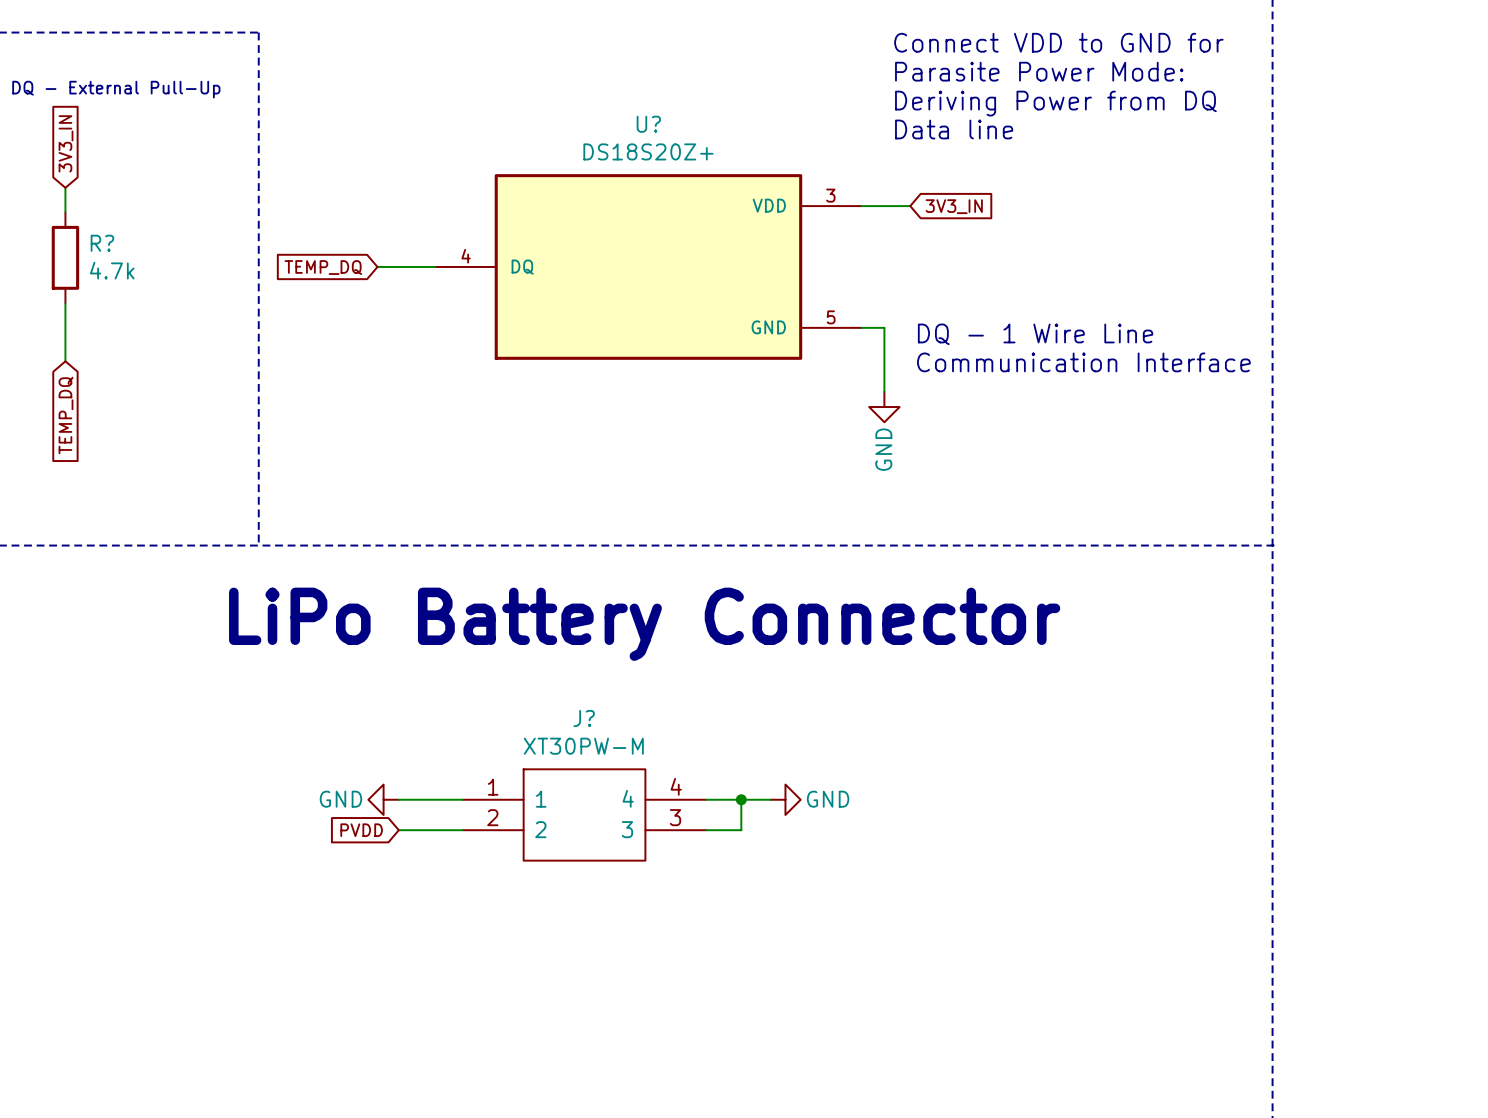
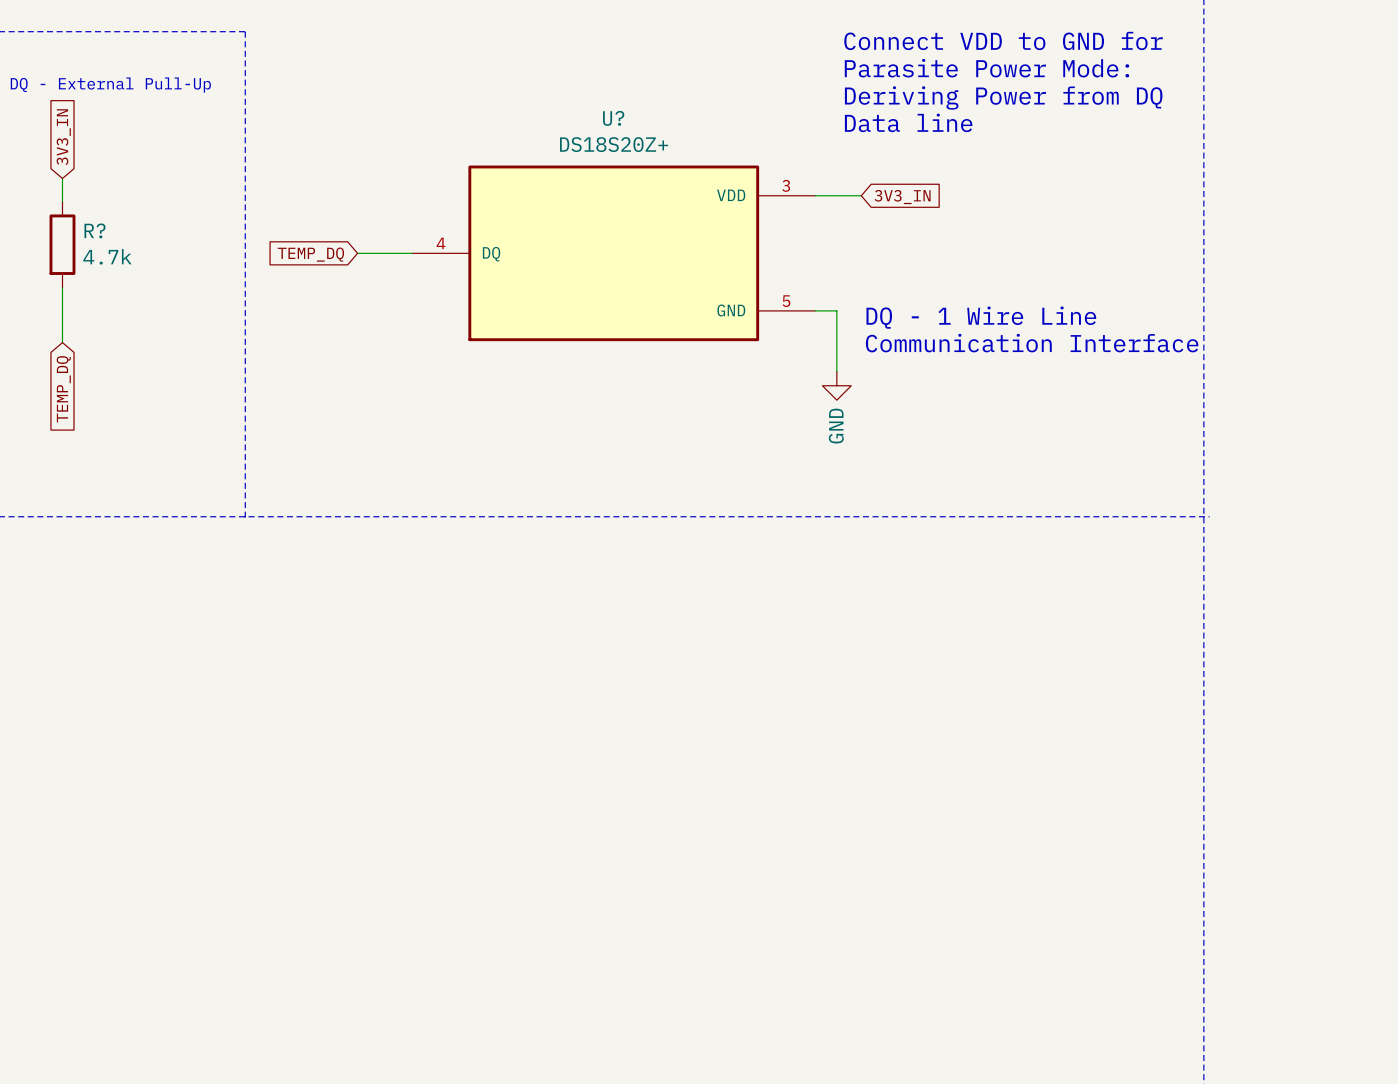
text: LiPo Battery Connector (644, 624) -> none
power symbol: GND (383, 799) -> none
wire: (398, 799) (462, 799) -> none
wire: (706, 799) (770, 799) -> none
wire: (741, 799) (741, 830) (706, 830) -> none
junction: (741, 799) -> none
power symbol: GND (785, 799) -> none
J?: XT30PW-M (584, 814) -> none
global label: PVDD (361, 830) -> none
wire: (398, 830) (462, 830) -> none

